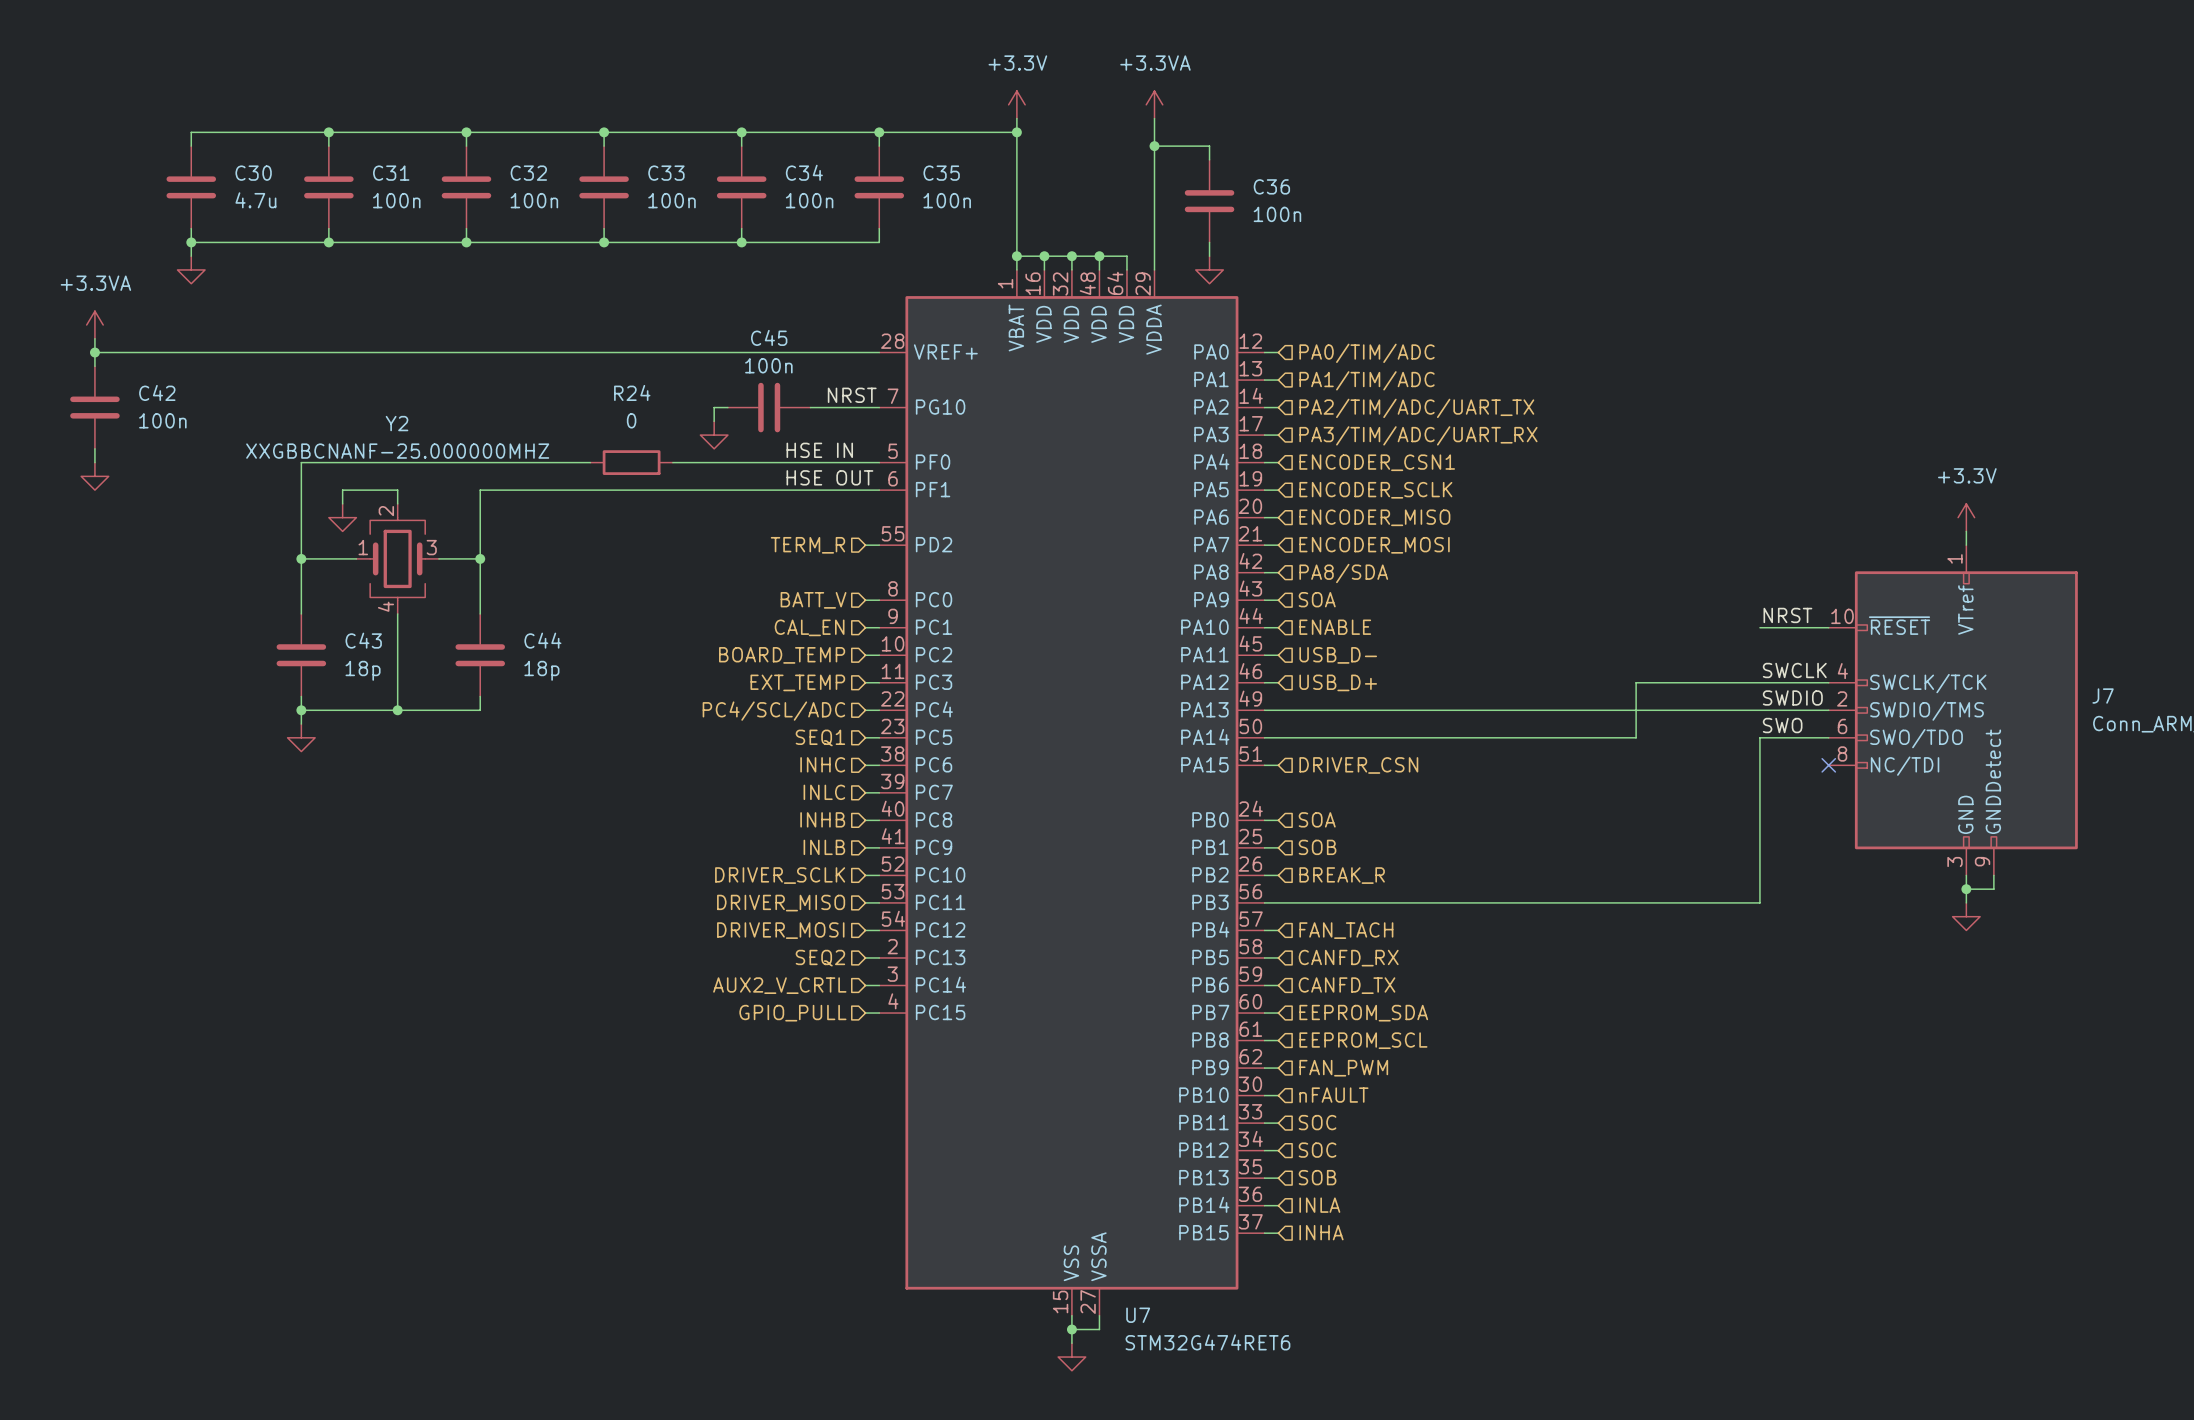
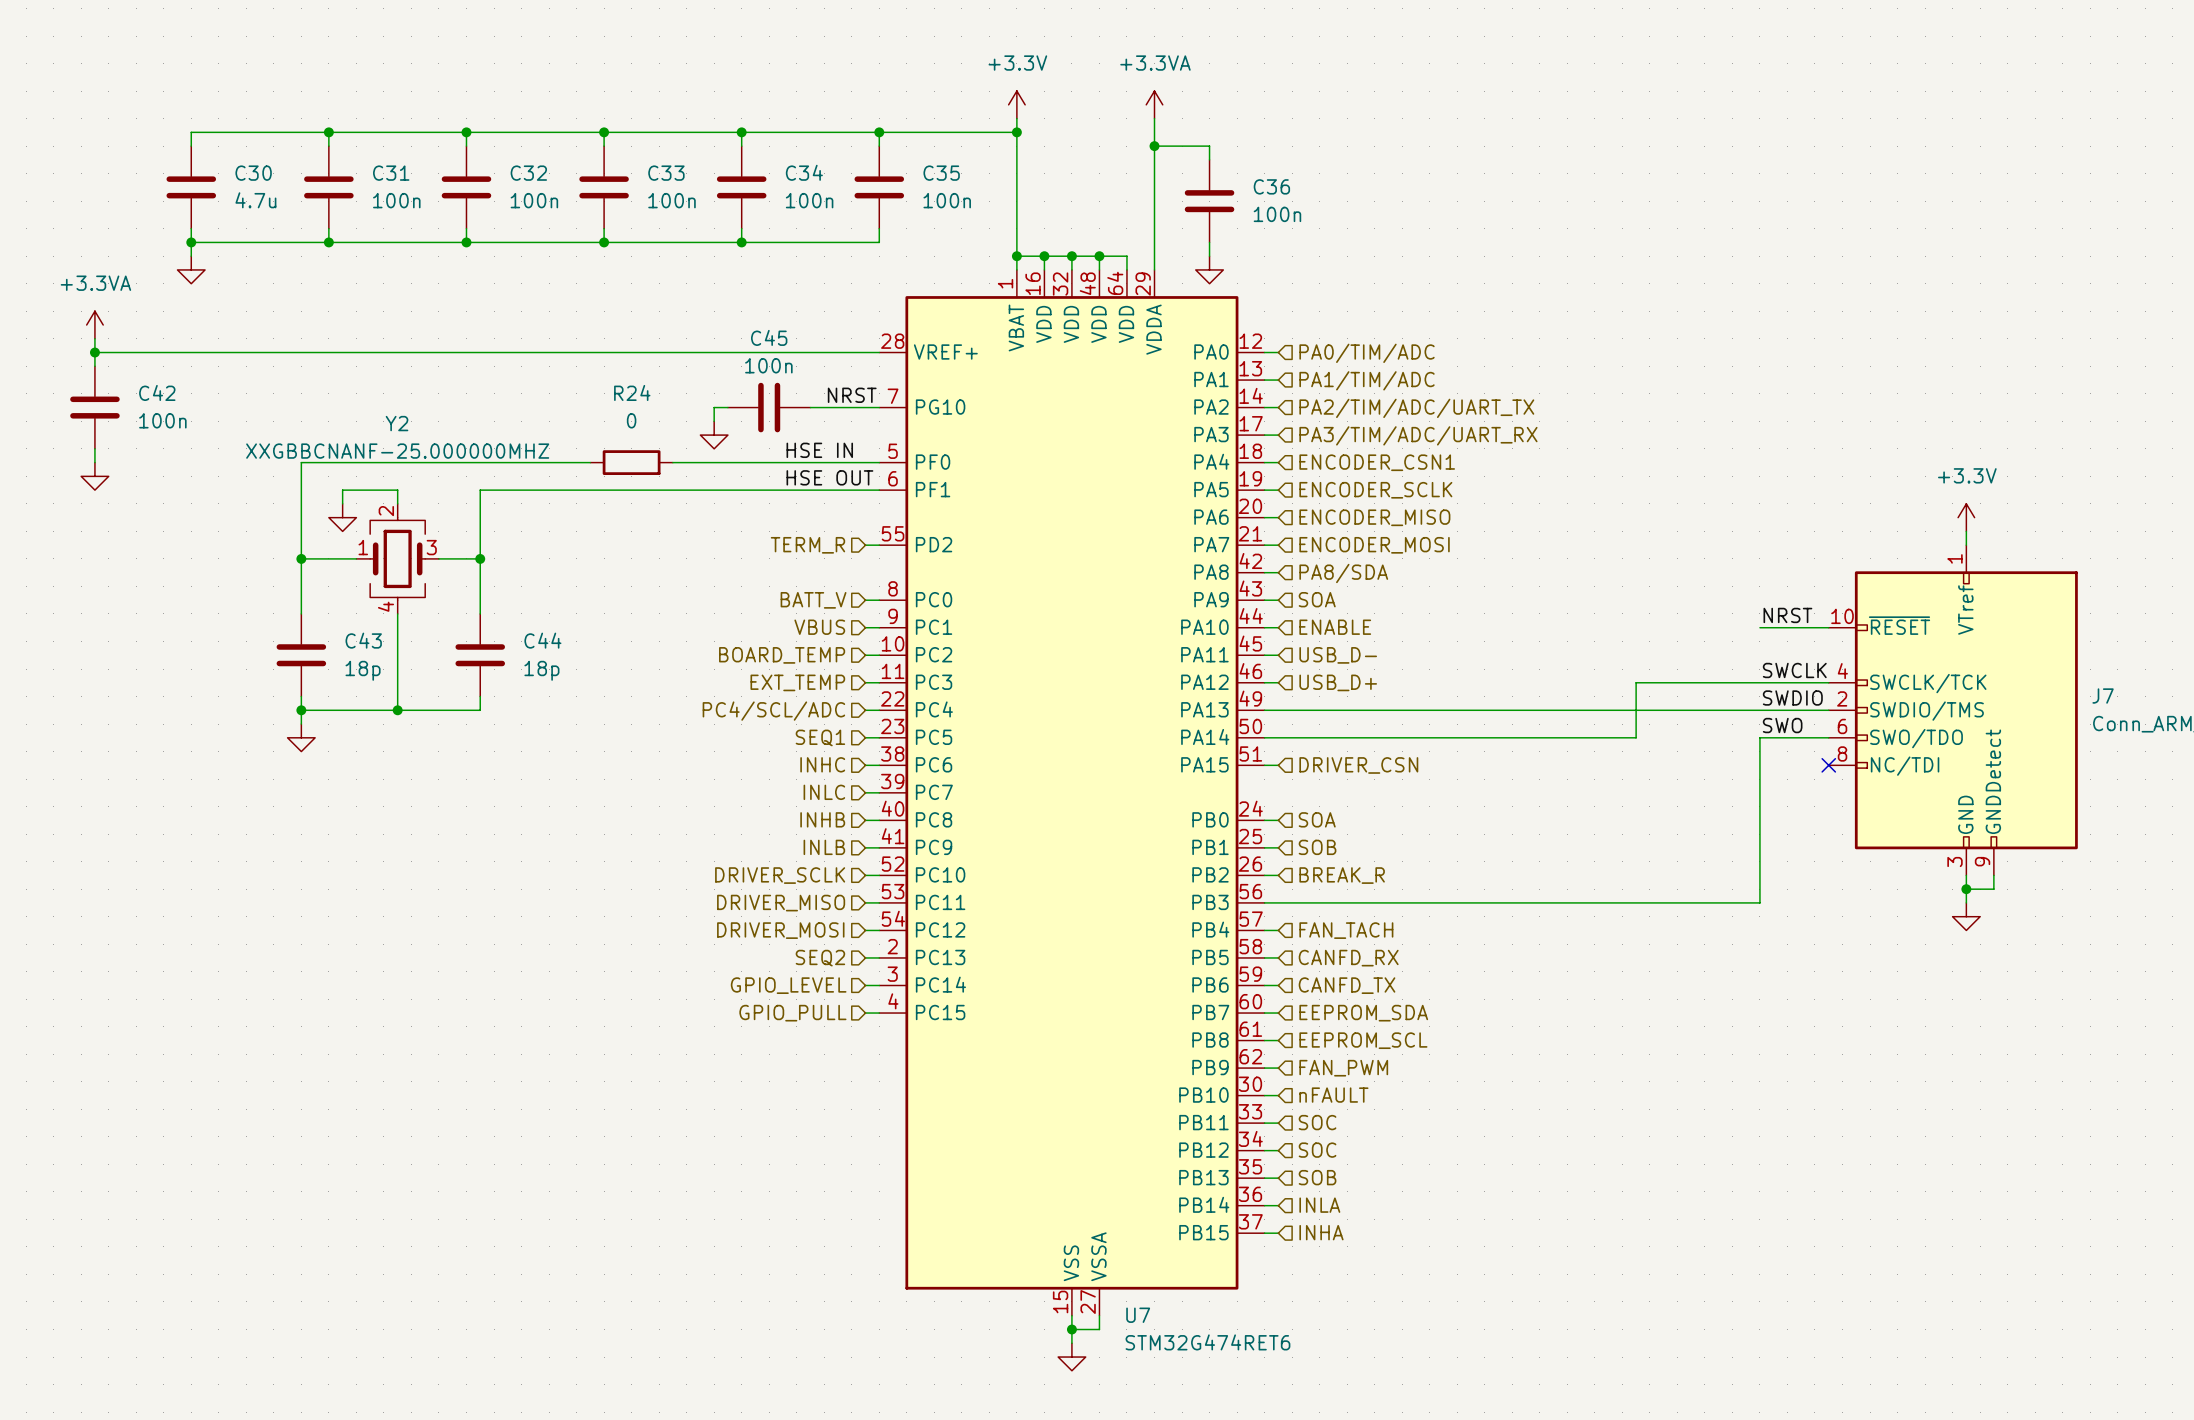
hierarchical label: CAL_EN (809, 627) -> VBUS (819, 627)
hierarchical label: AUX2_V_CRTL (779, 985) -> GPIO_LEVEL (788, 985)

